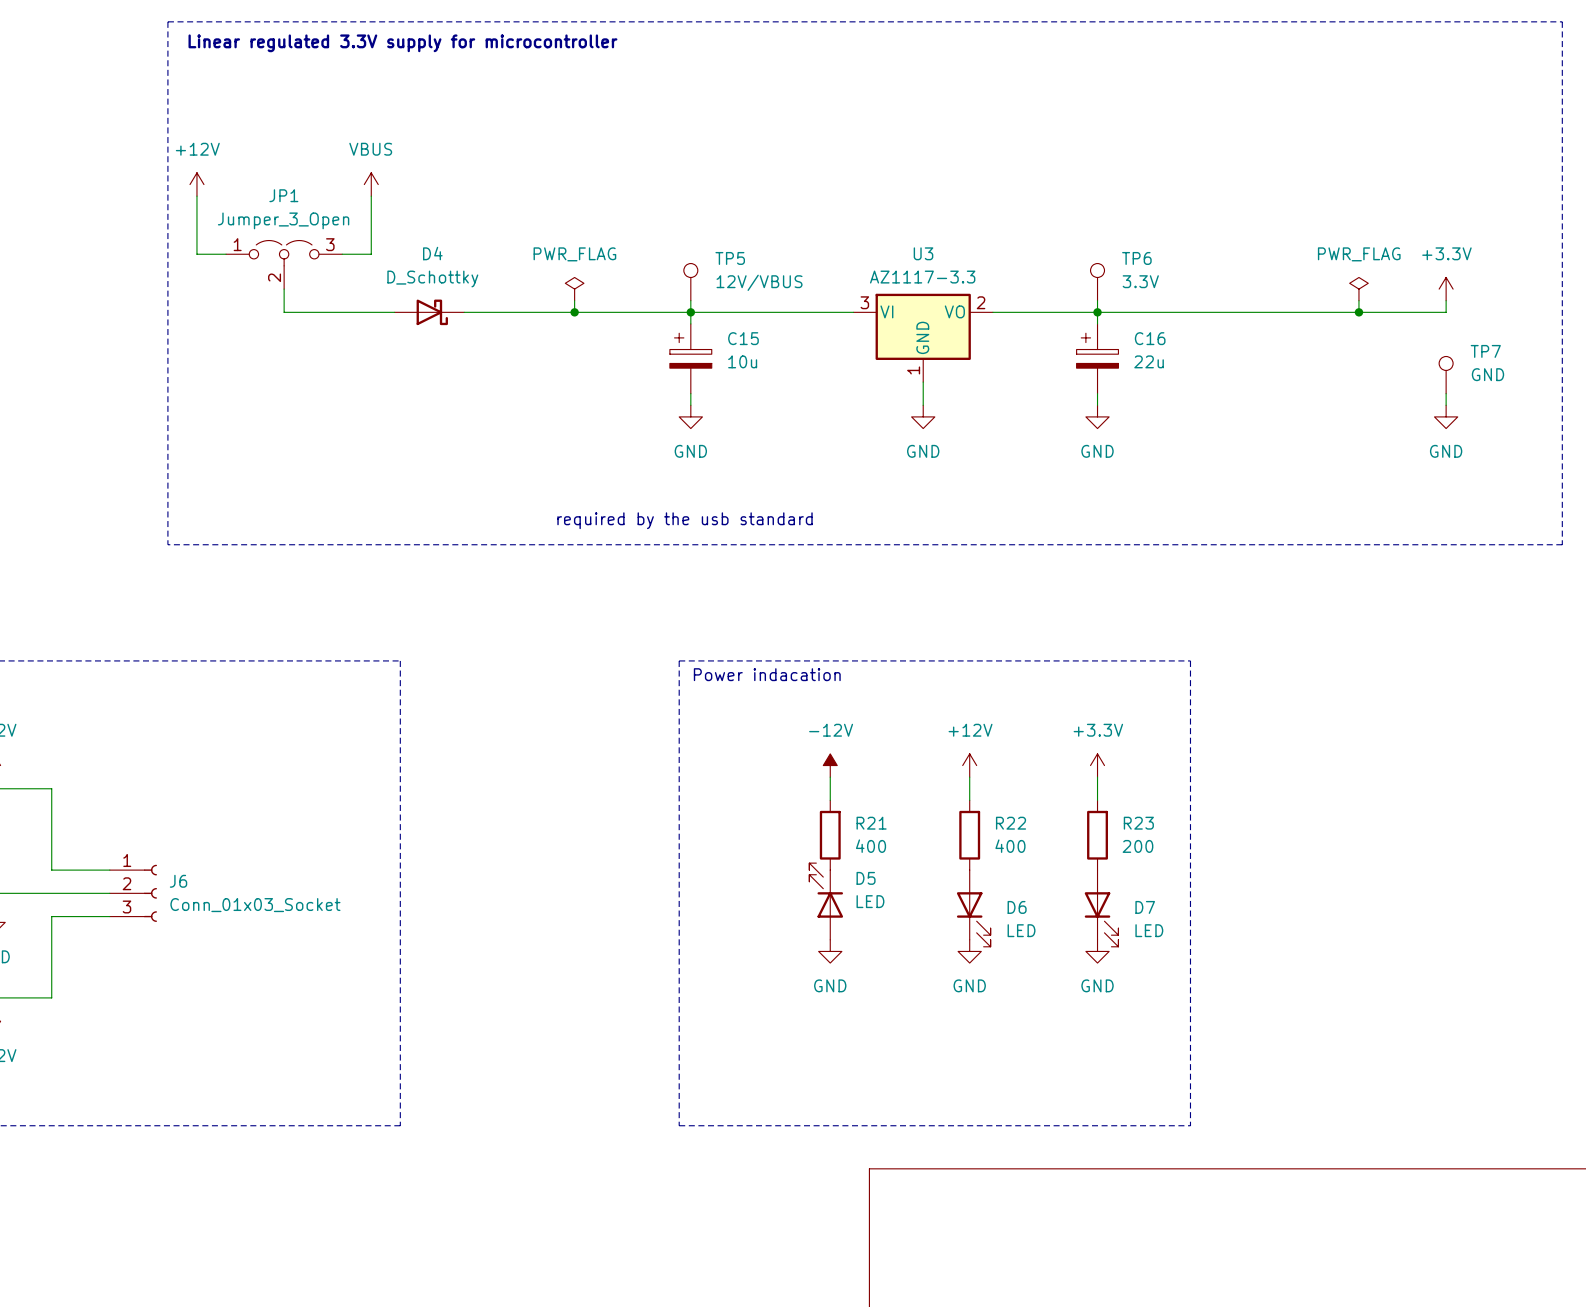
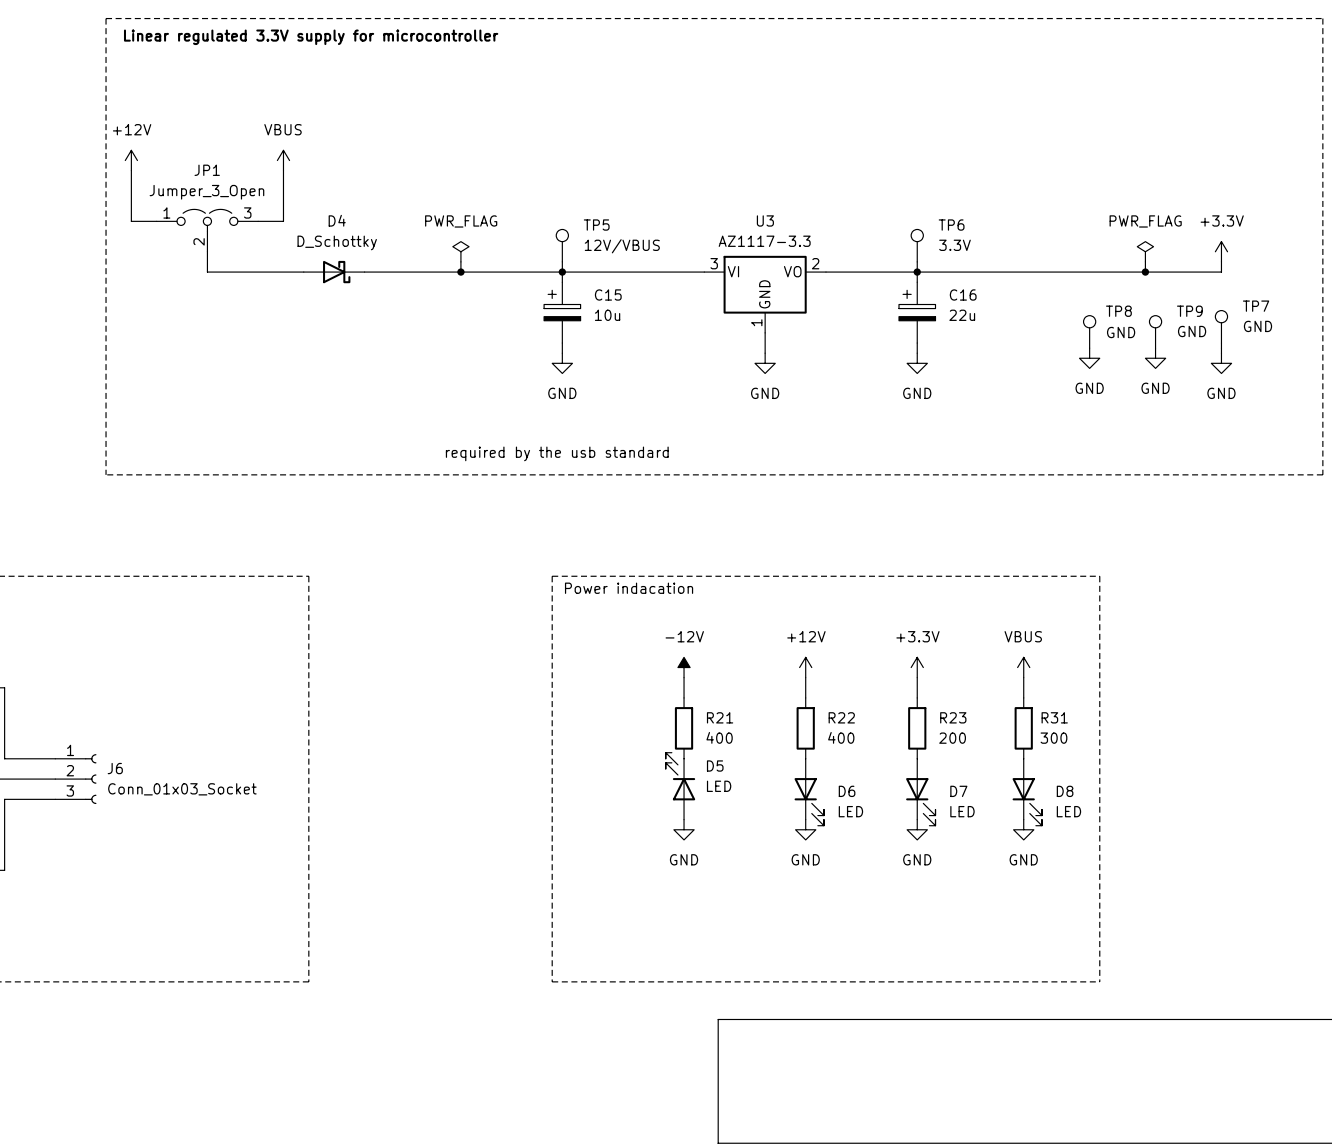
TP8: none -> GND (1089, 331)
TP9: none -> GND (1155, 331)
power symbol: none -> GND (1089, 358)
power symbol: none -> GND (1155, 358)
line: (1190, 660) (1190, 1125) -> (998, 576) (1099, 576) (1099, 981) (998, 981)
power symbol: none -> VBUS (1023, 667)
wire: none -> (1023, 677) (1023, 697)
R31: none -> 300 (1023, 728)
D8: none -> LED (1027, 792)
power symbol: none -> GND (1023, 829)

